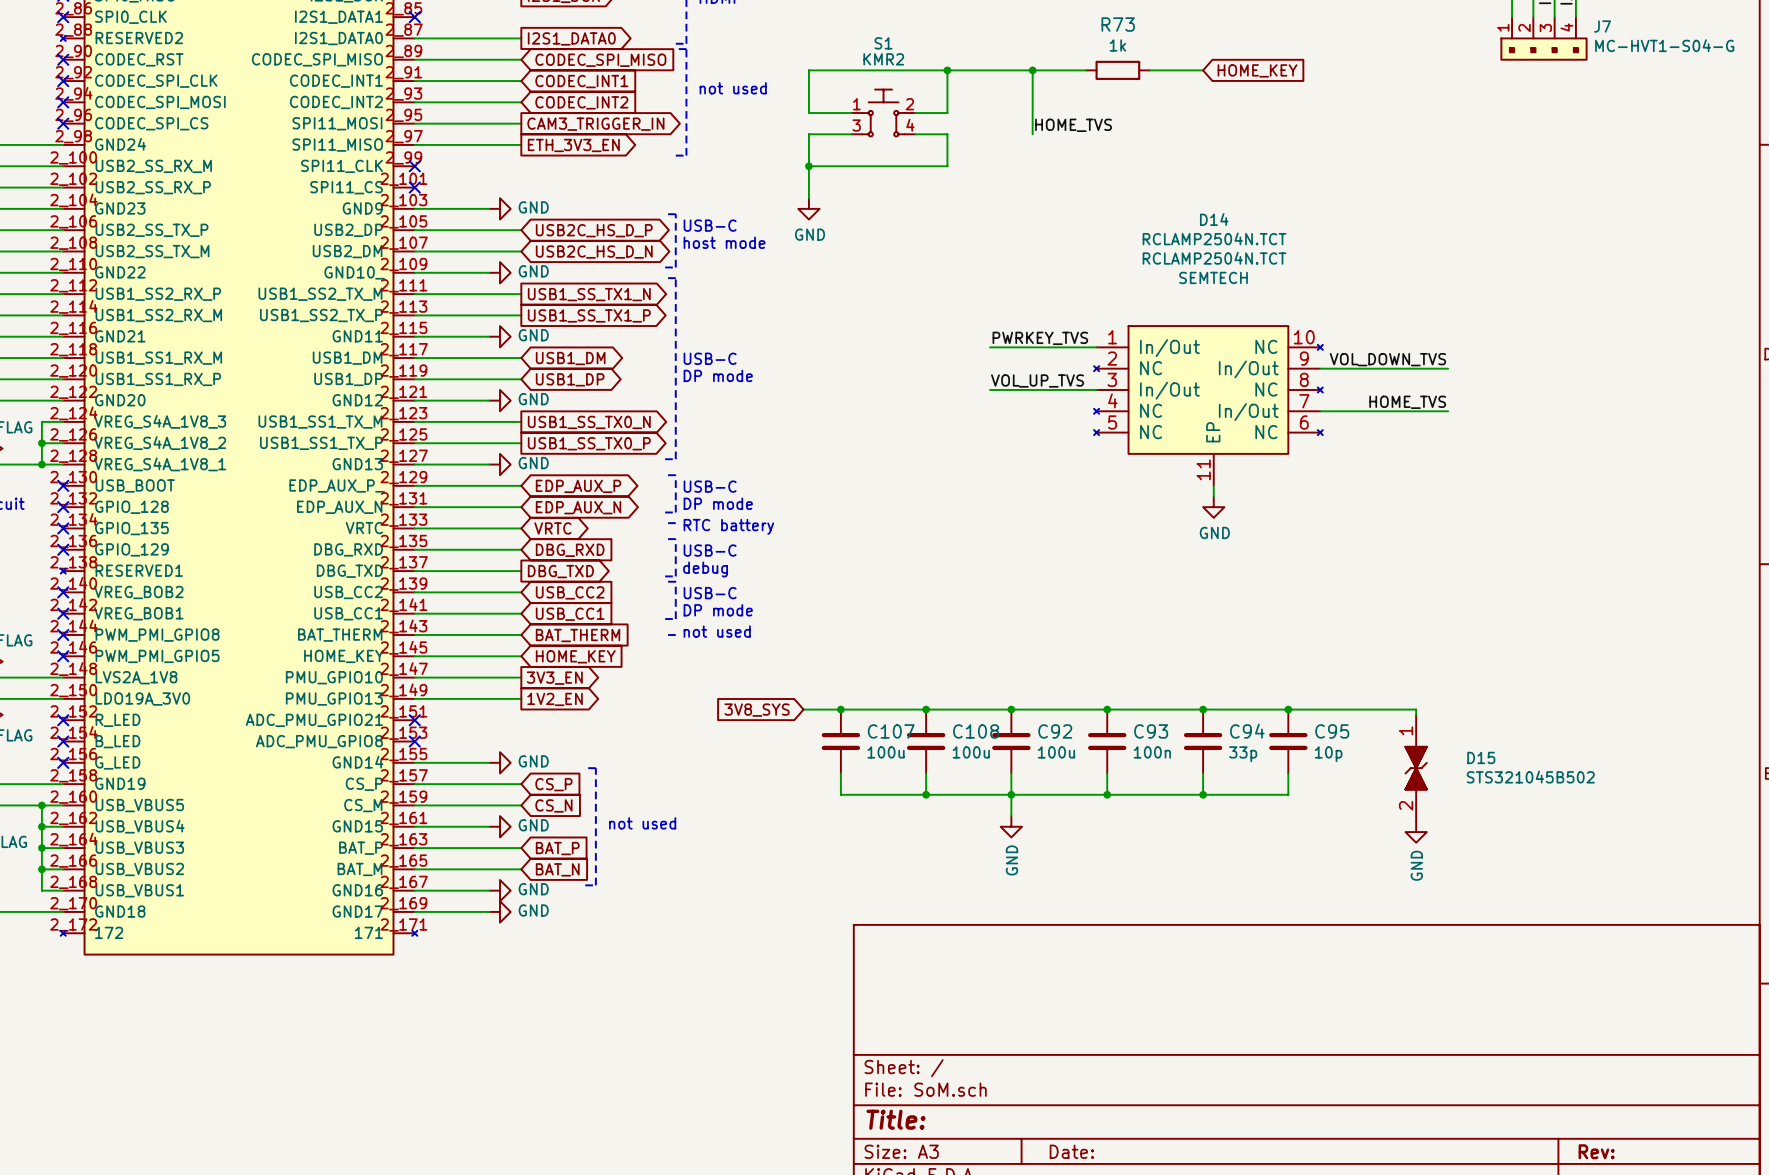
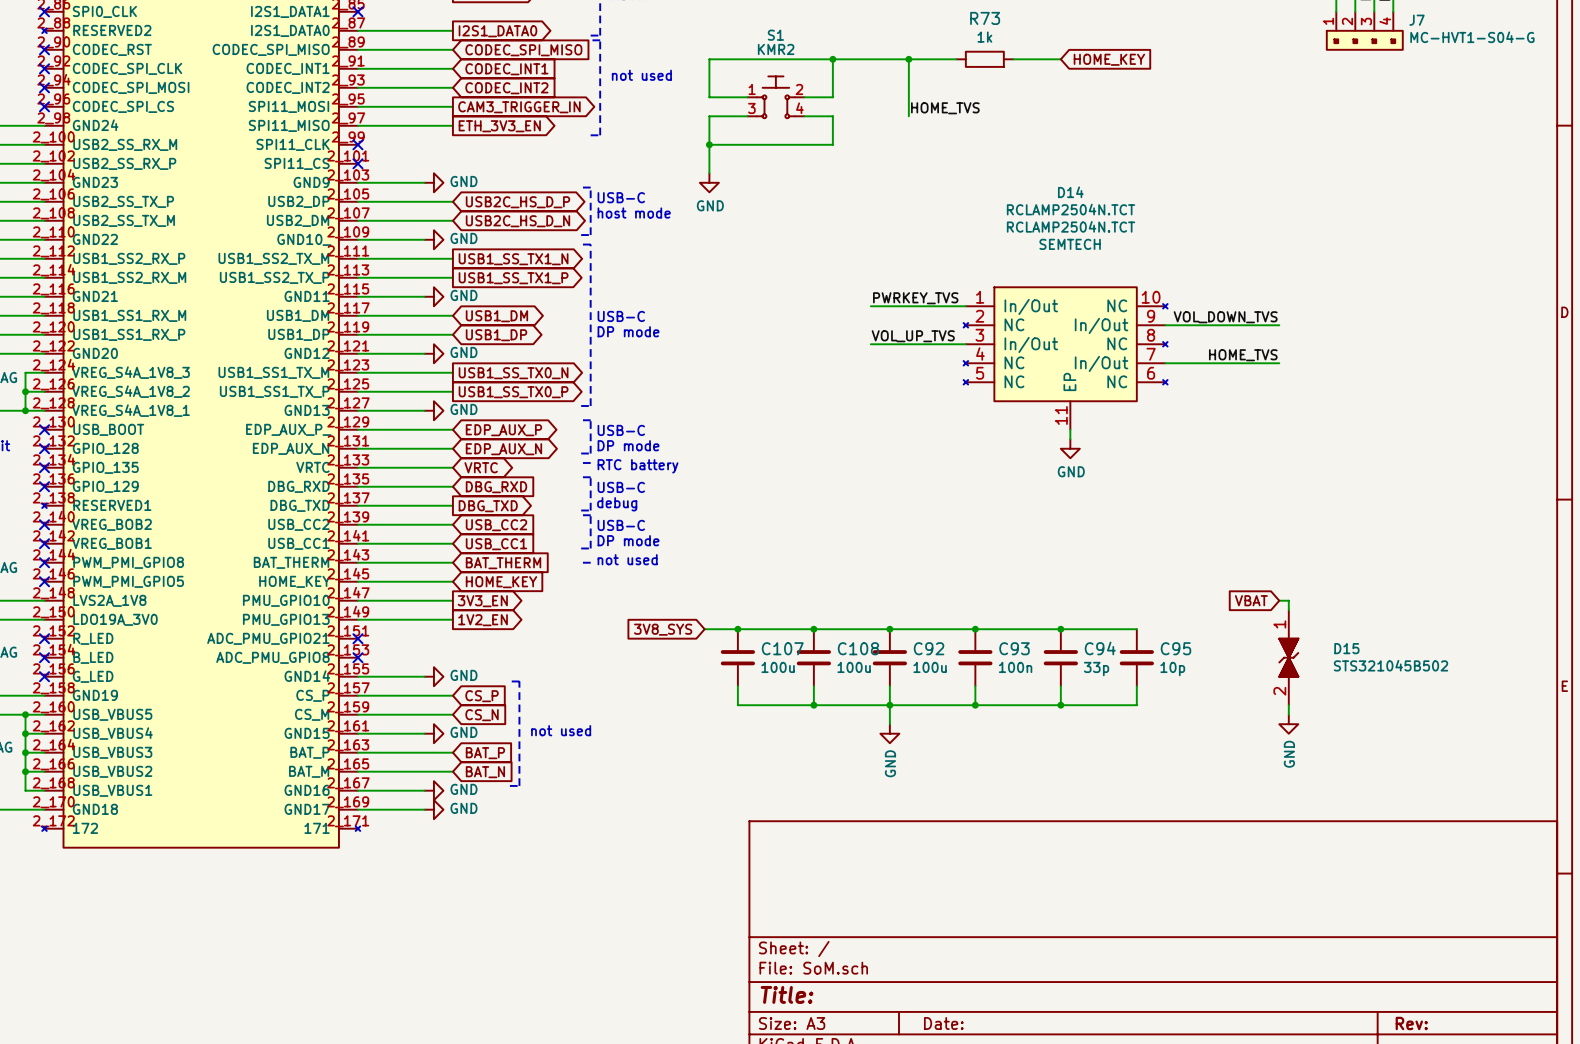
global label: none -> VBAT (1251, 600)
wire: none -> (1279, 600) (1288, 600) (1288, 610)
wire: (1288, 709) (1416, 709) (1416, 714) -> none
junction: (1288, 709) -> none
D15 position: (1416, 768) -> (1288, 657)
wire: none -> (1288, 705) (1288, 714)
power symbol position: GND (1416, 832) -> GND (1288, 724)

